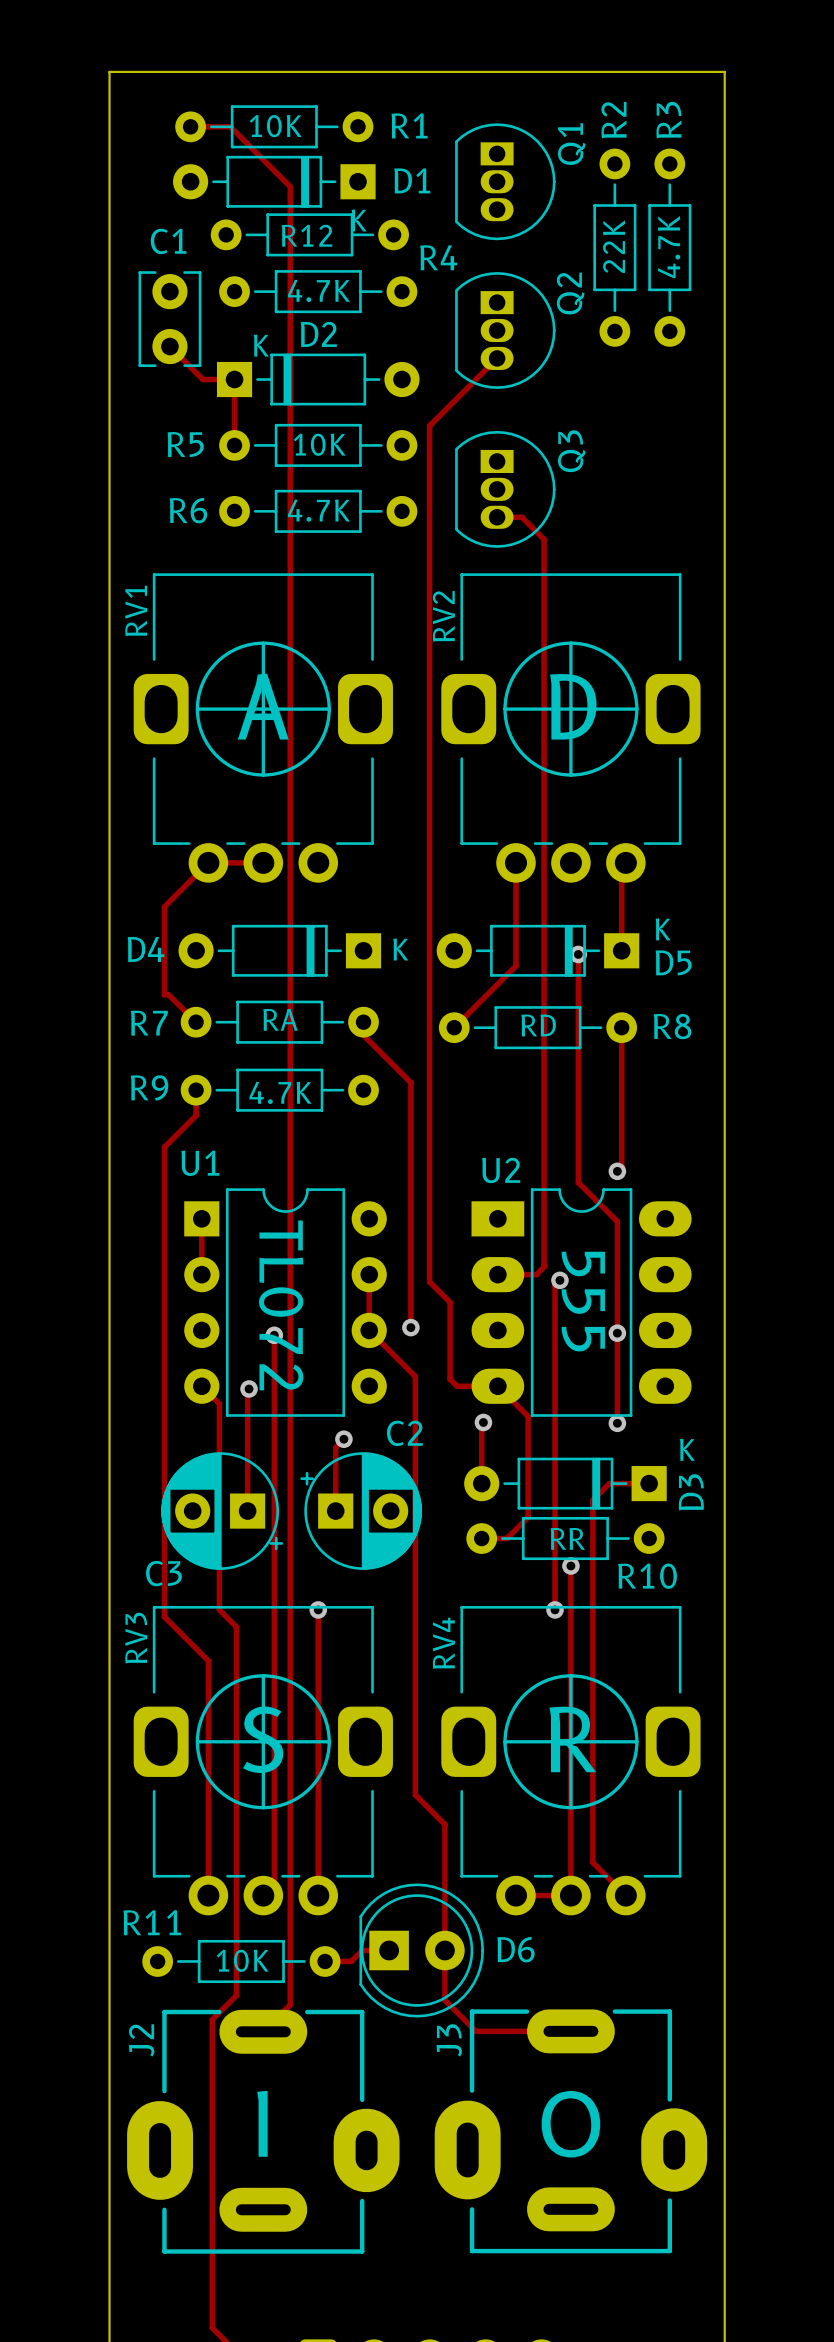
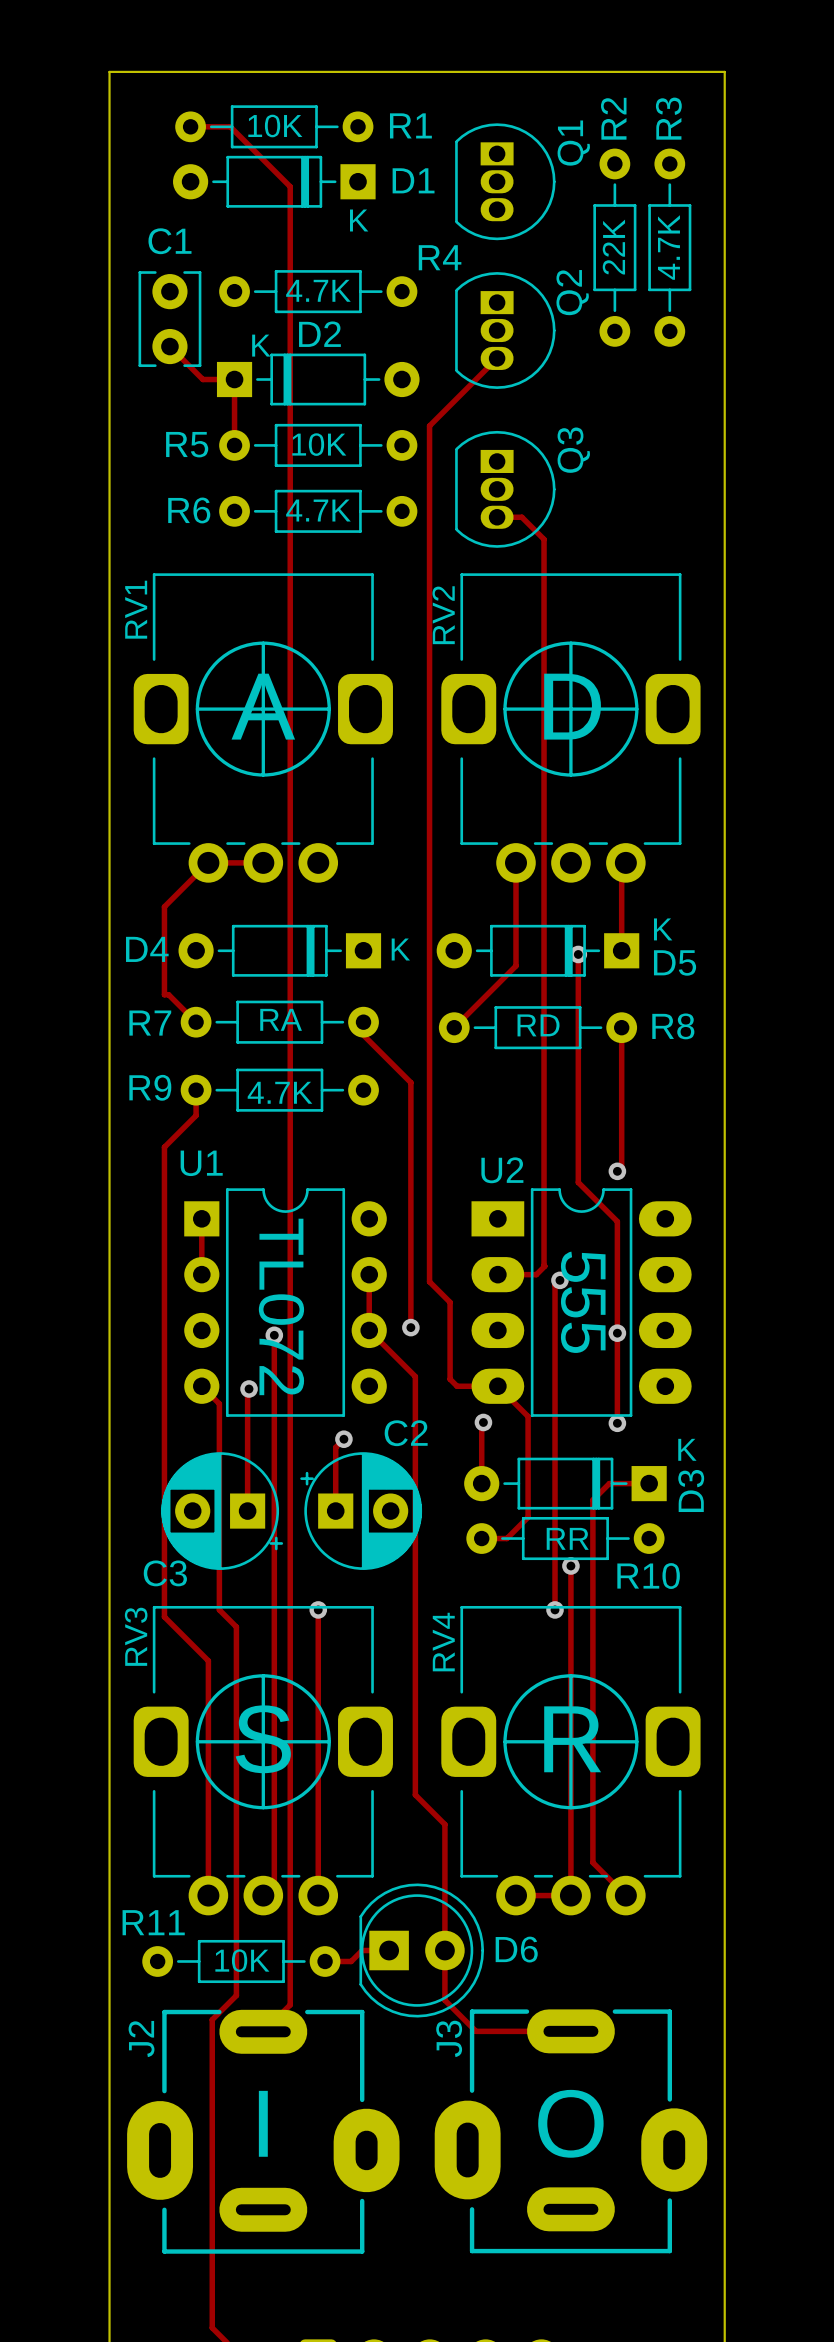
R12: (309, 234) -> none

